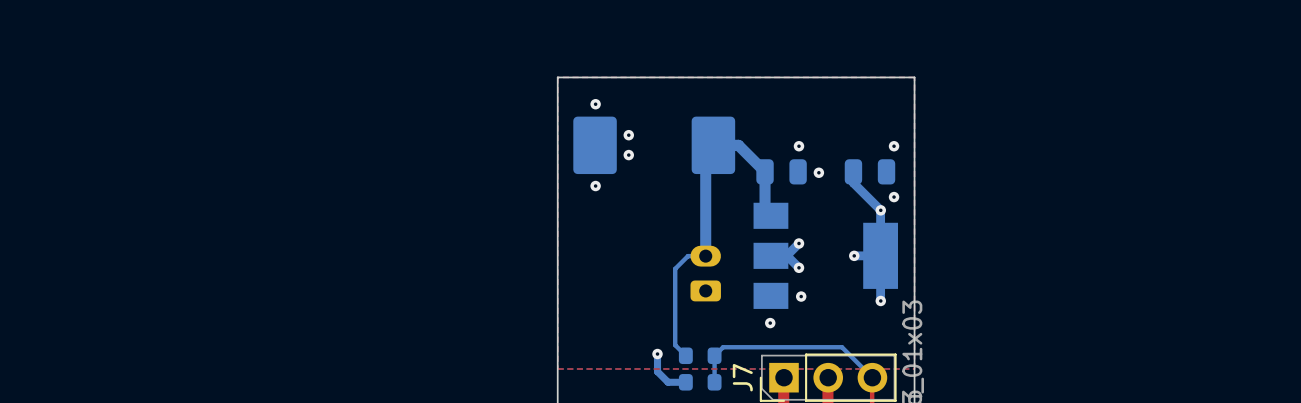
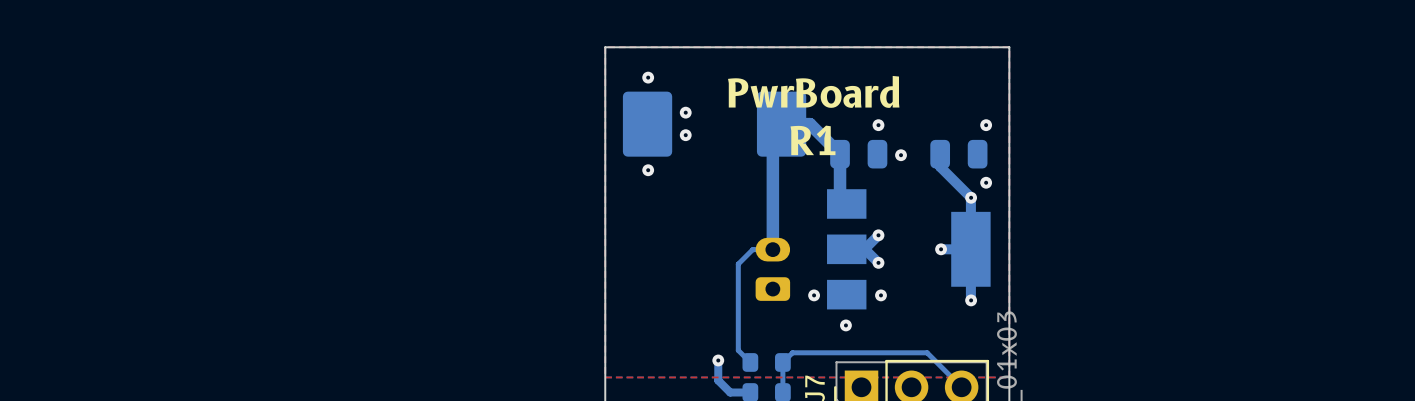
text: none -> PwrBoard (813, 91)
text: none -> R1 (813, 140)
via: none -> (814, 295)

